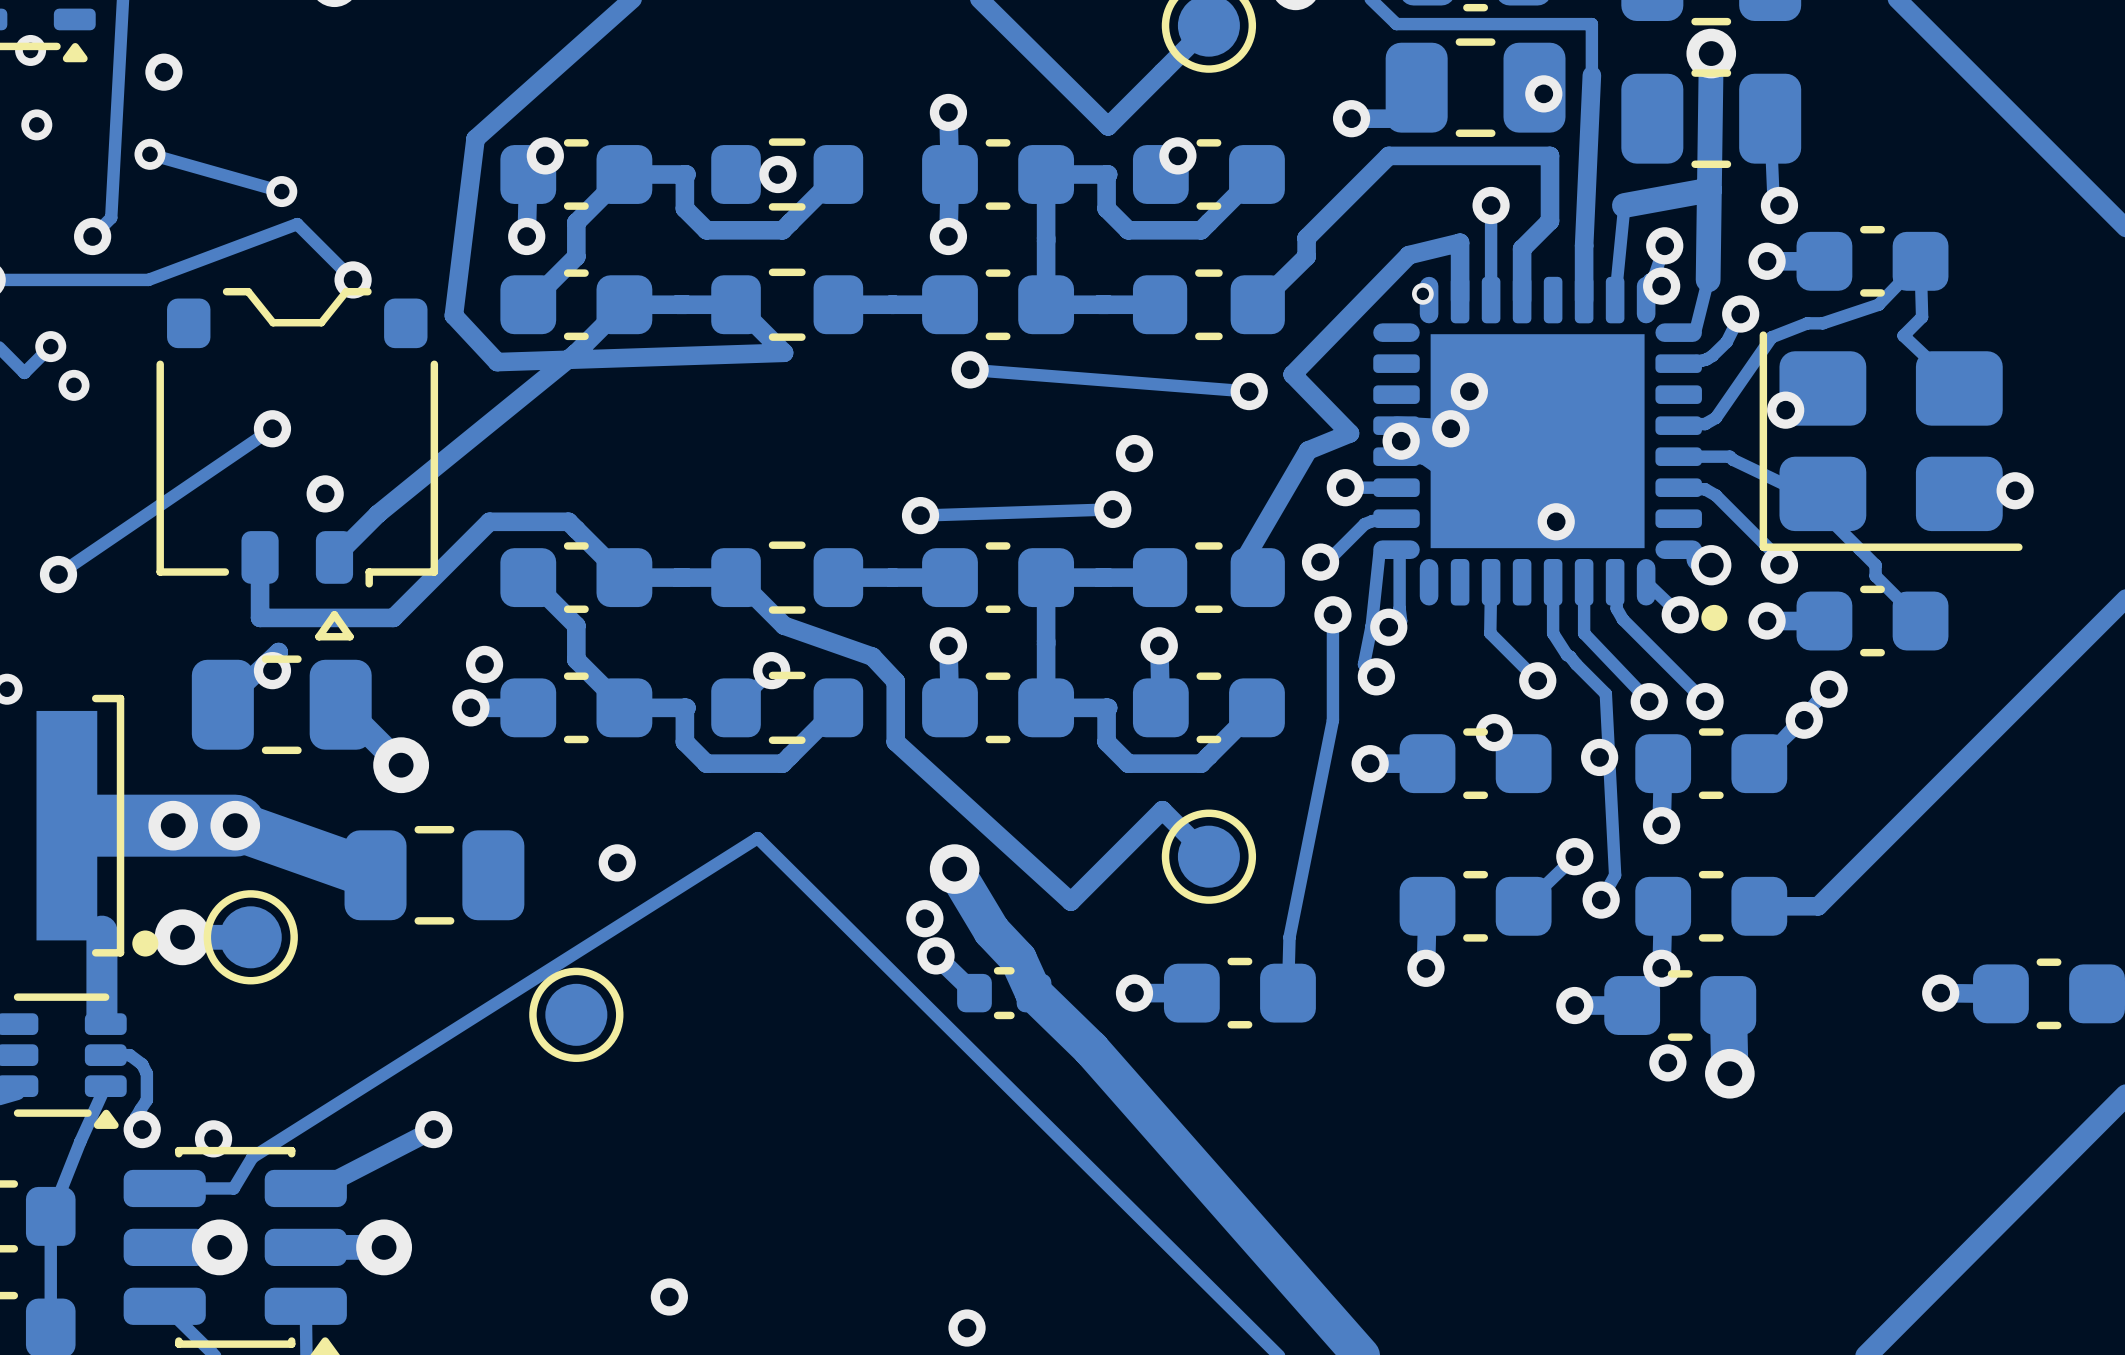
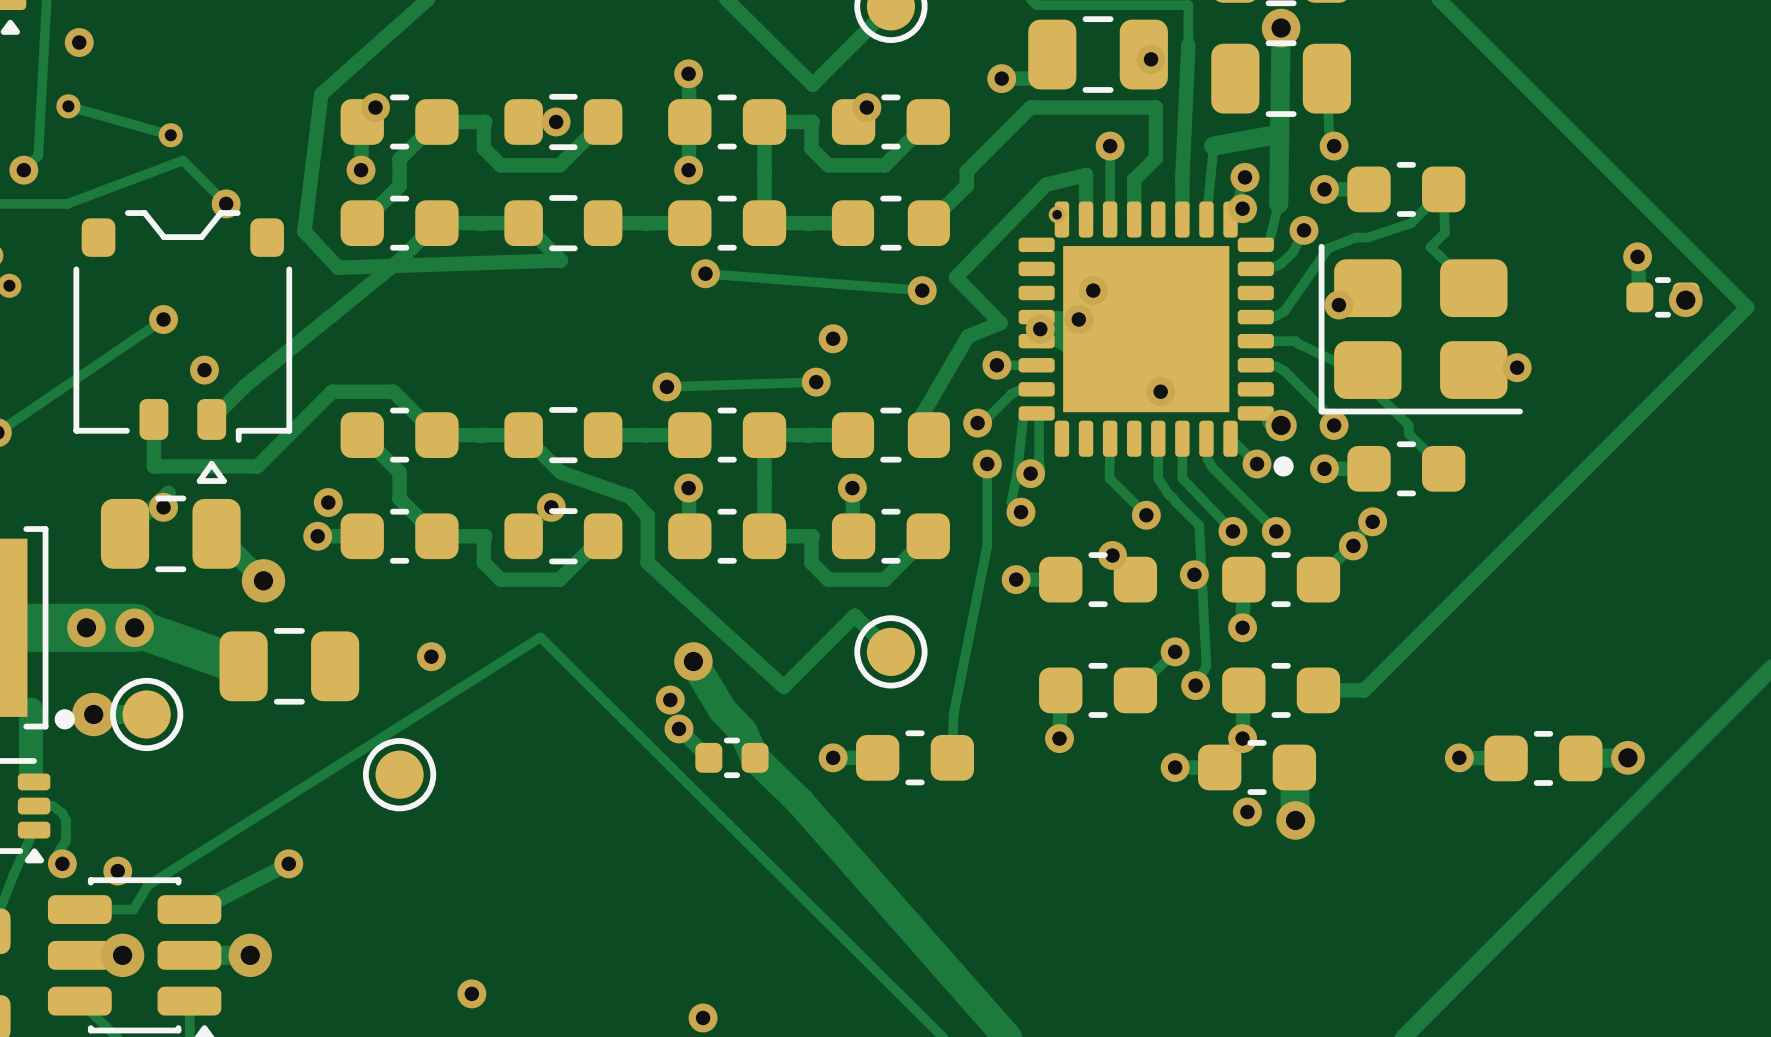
part footprint: [1373, 276, 1728, 631] -> [1018, 201, 1294, 477]

